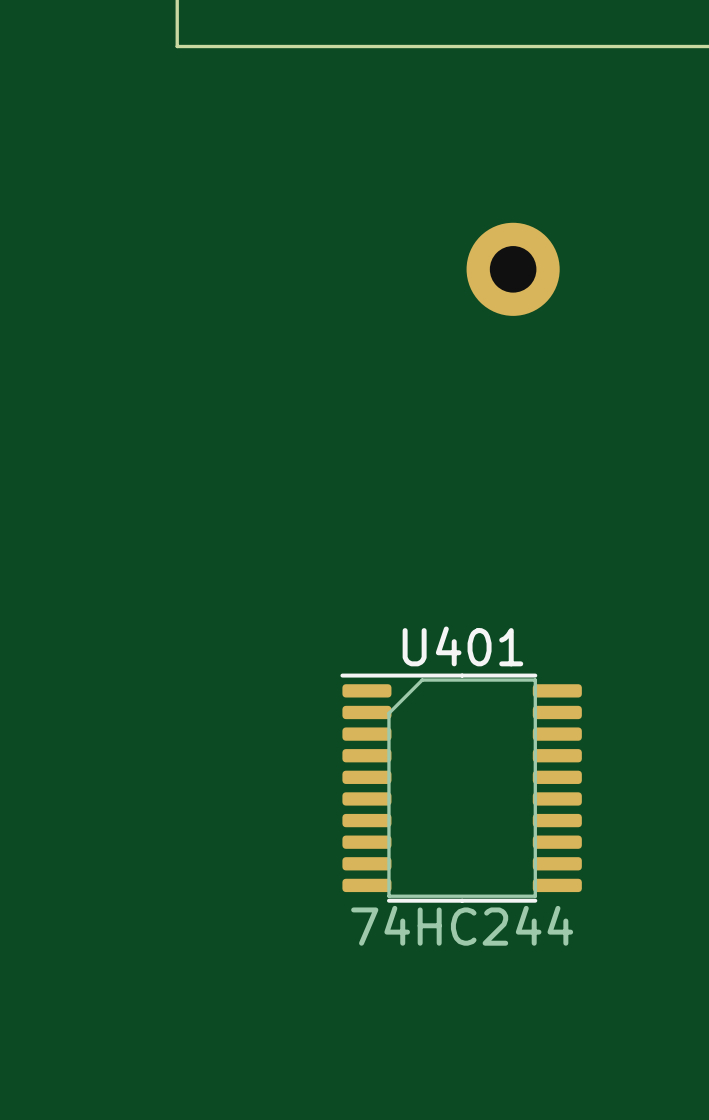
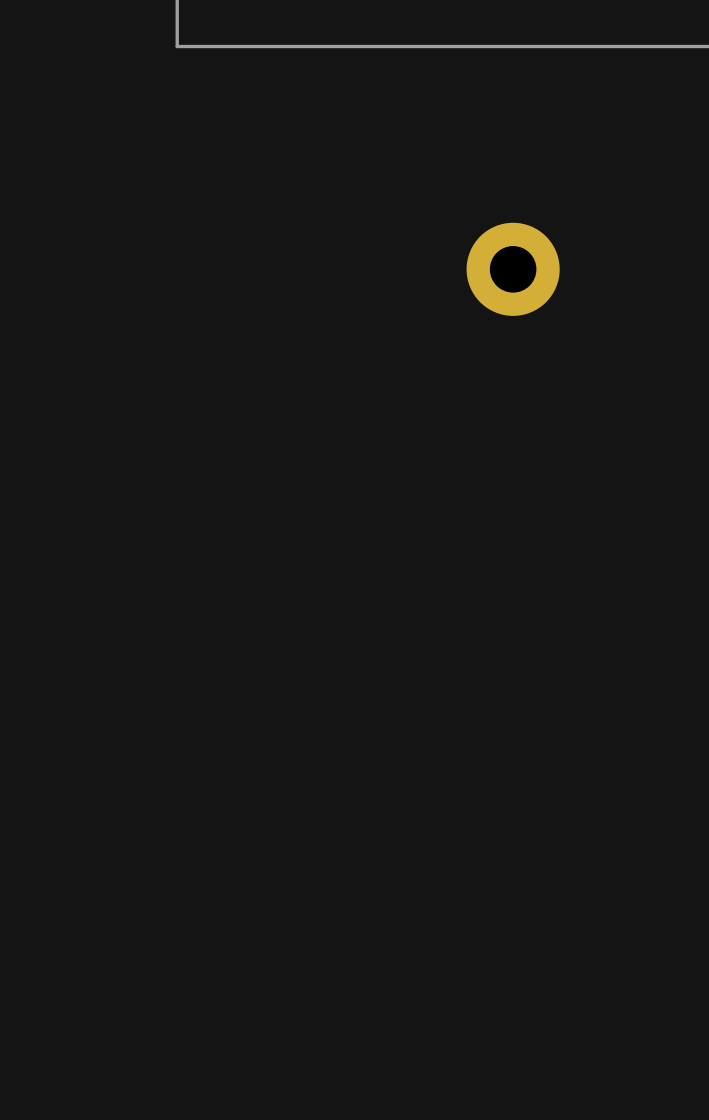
U401: 74HC244 (461, 788) -> none

